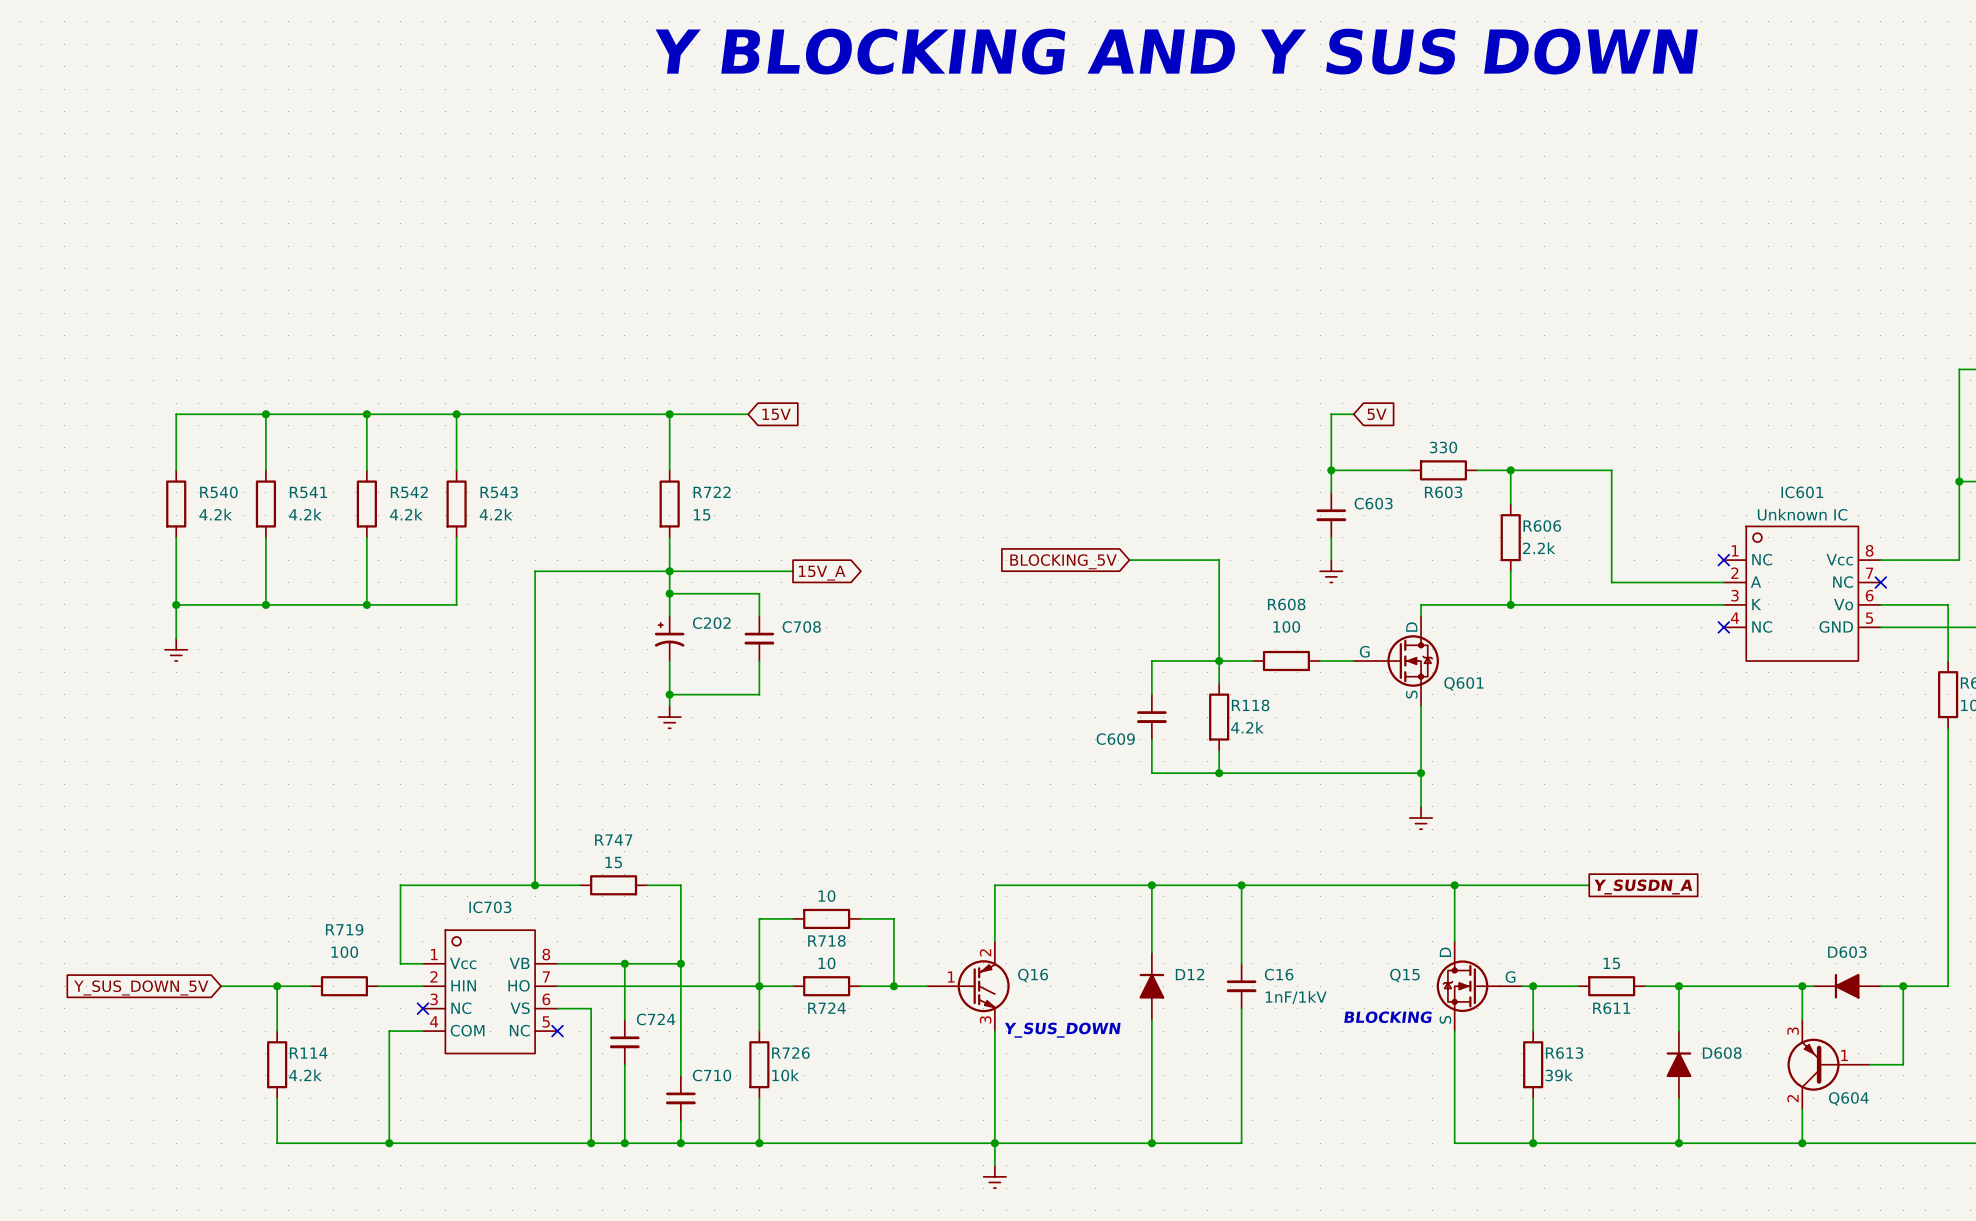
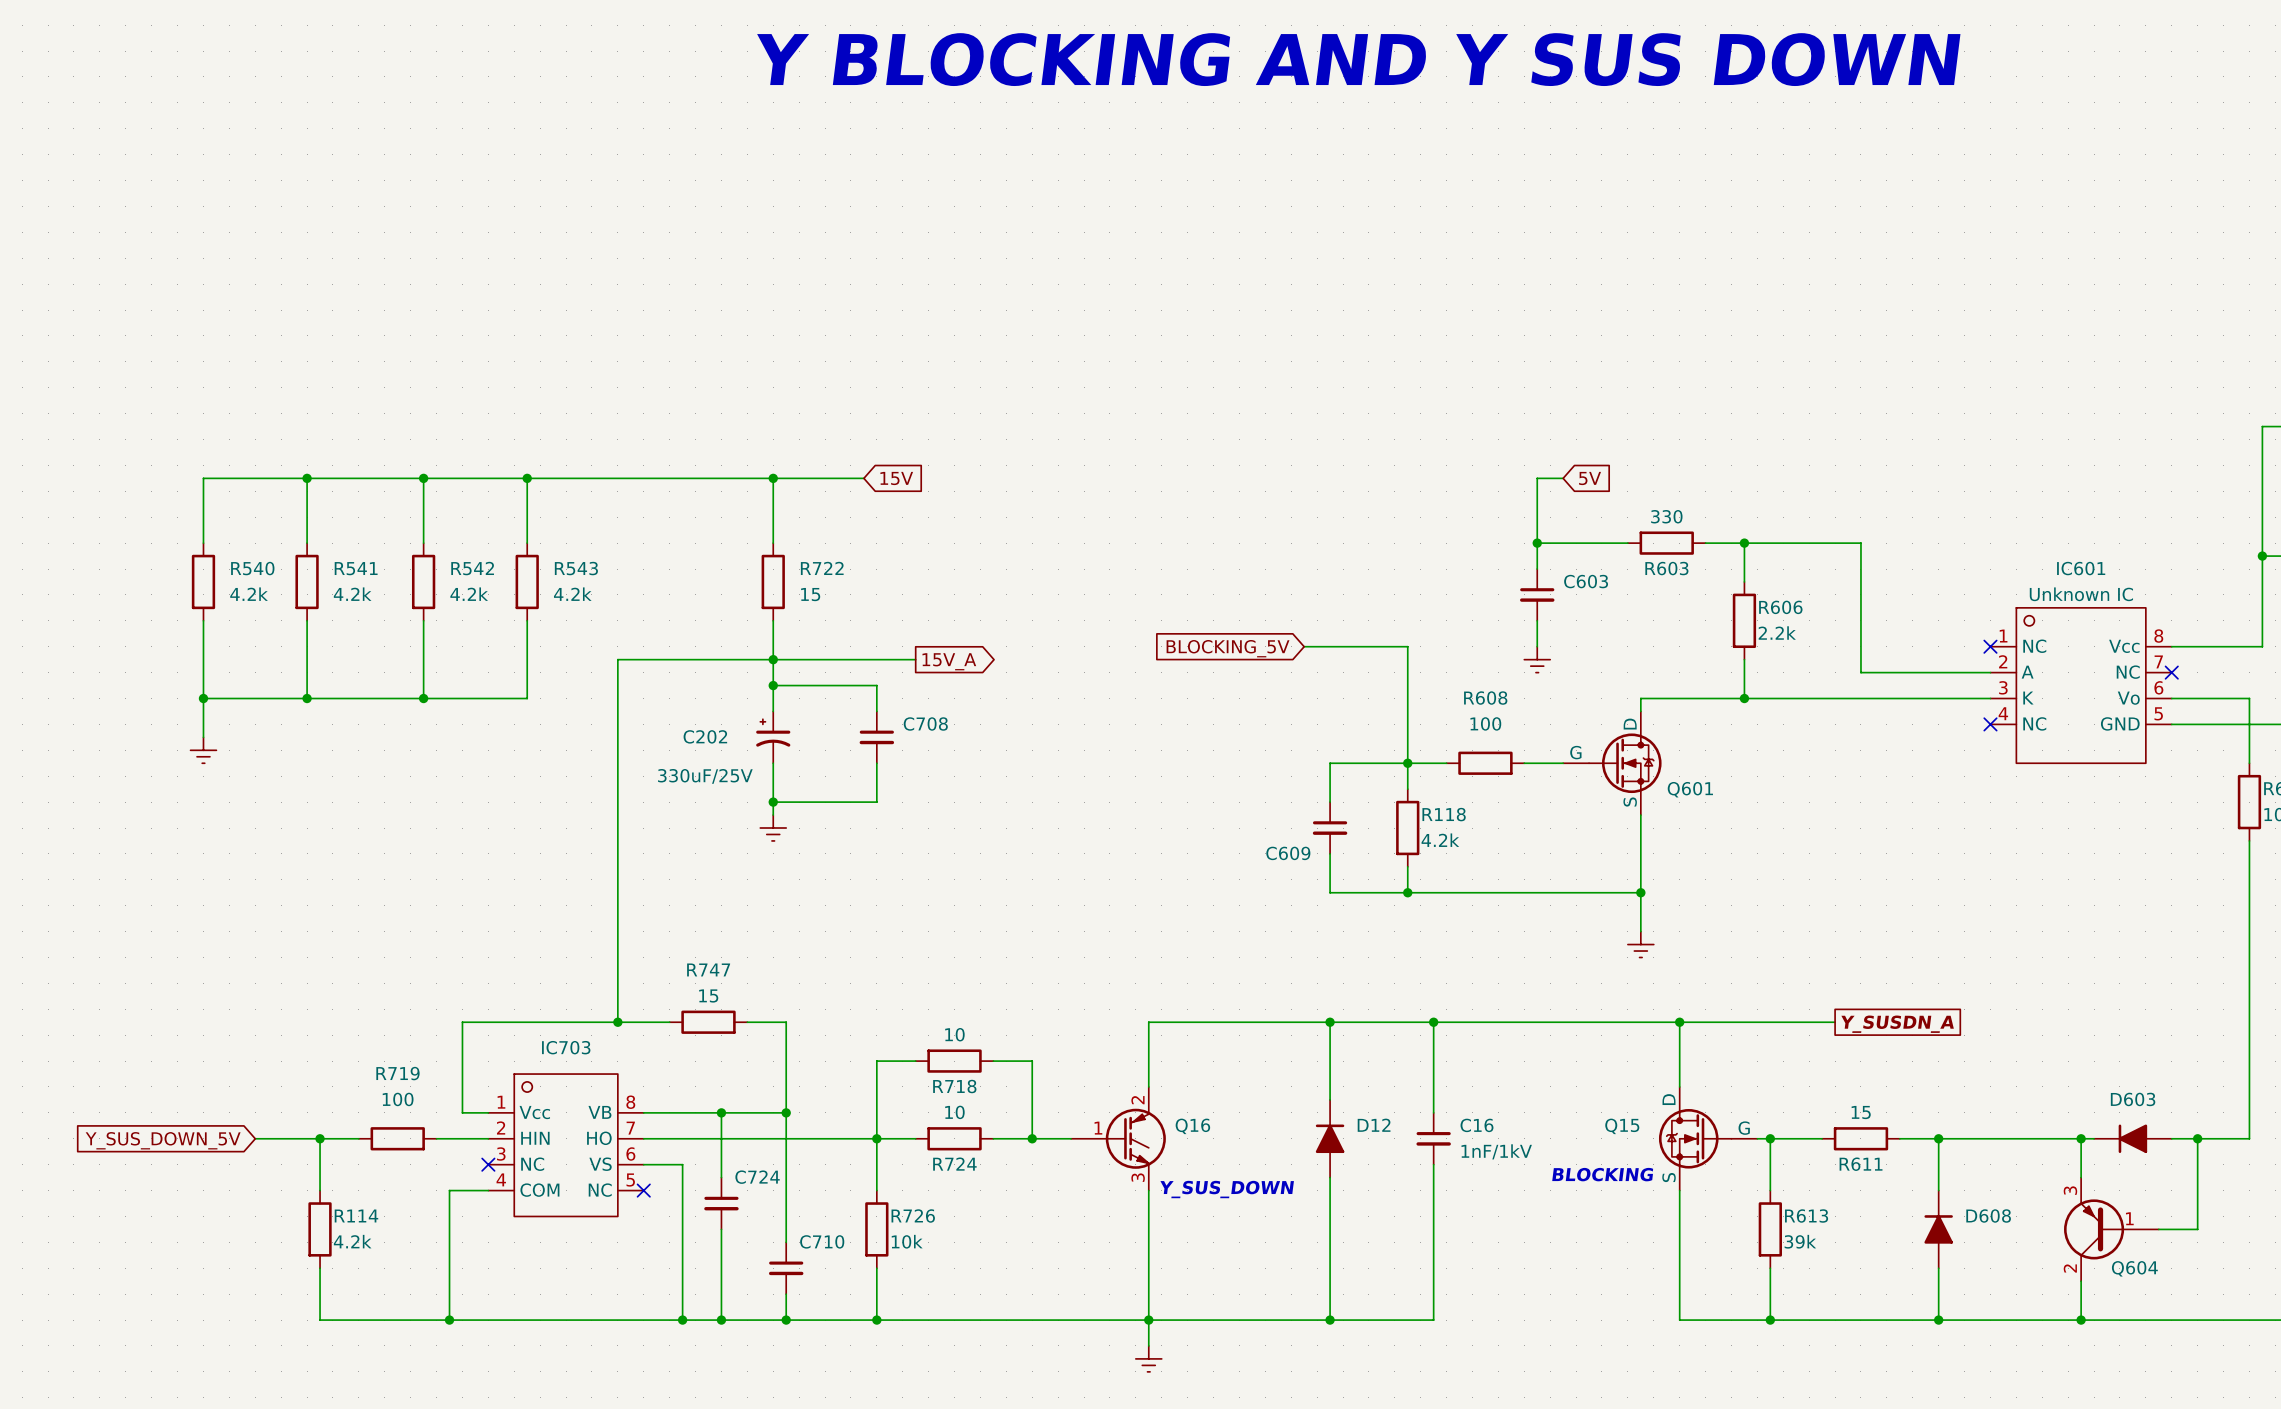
C202 name position: C202 (711, 623) -> C202 (705, 736)
C202 value: none -> 330uF/25V (705, 776)

